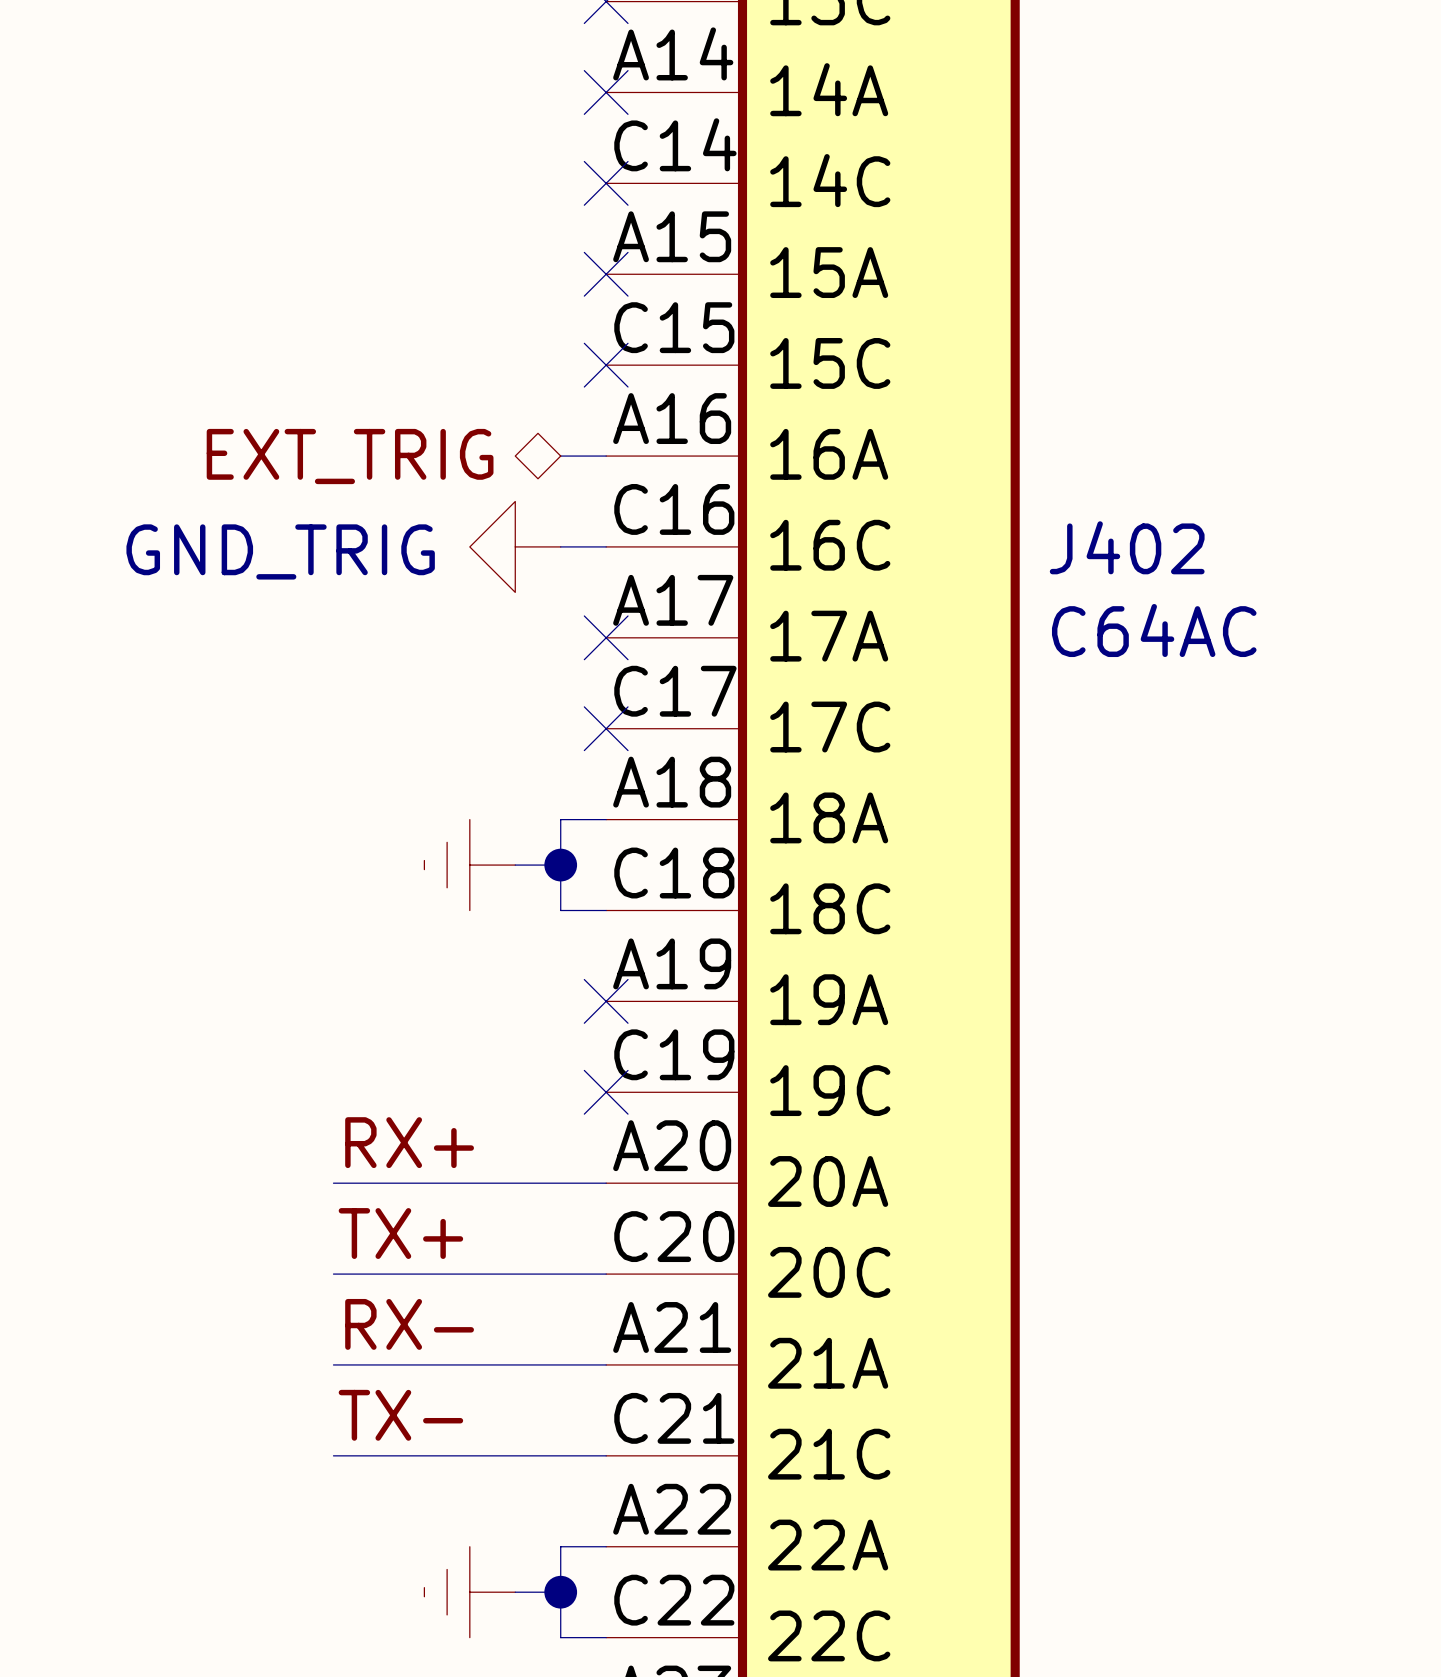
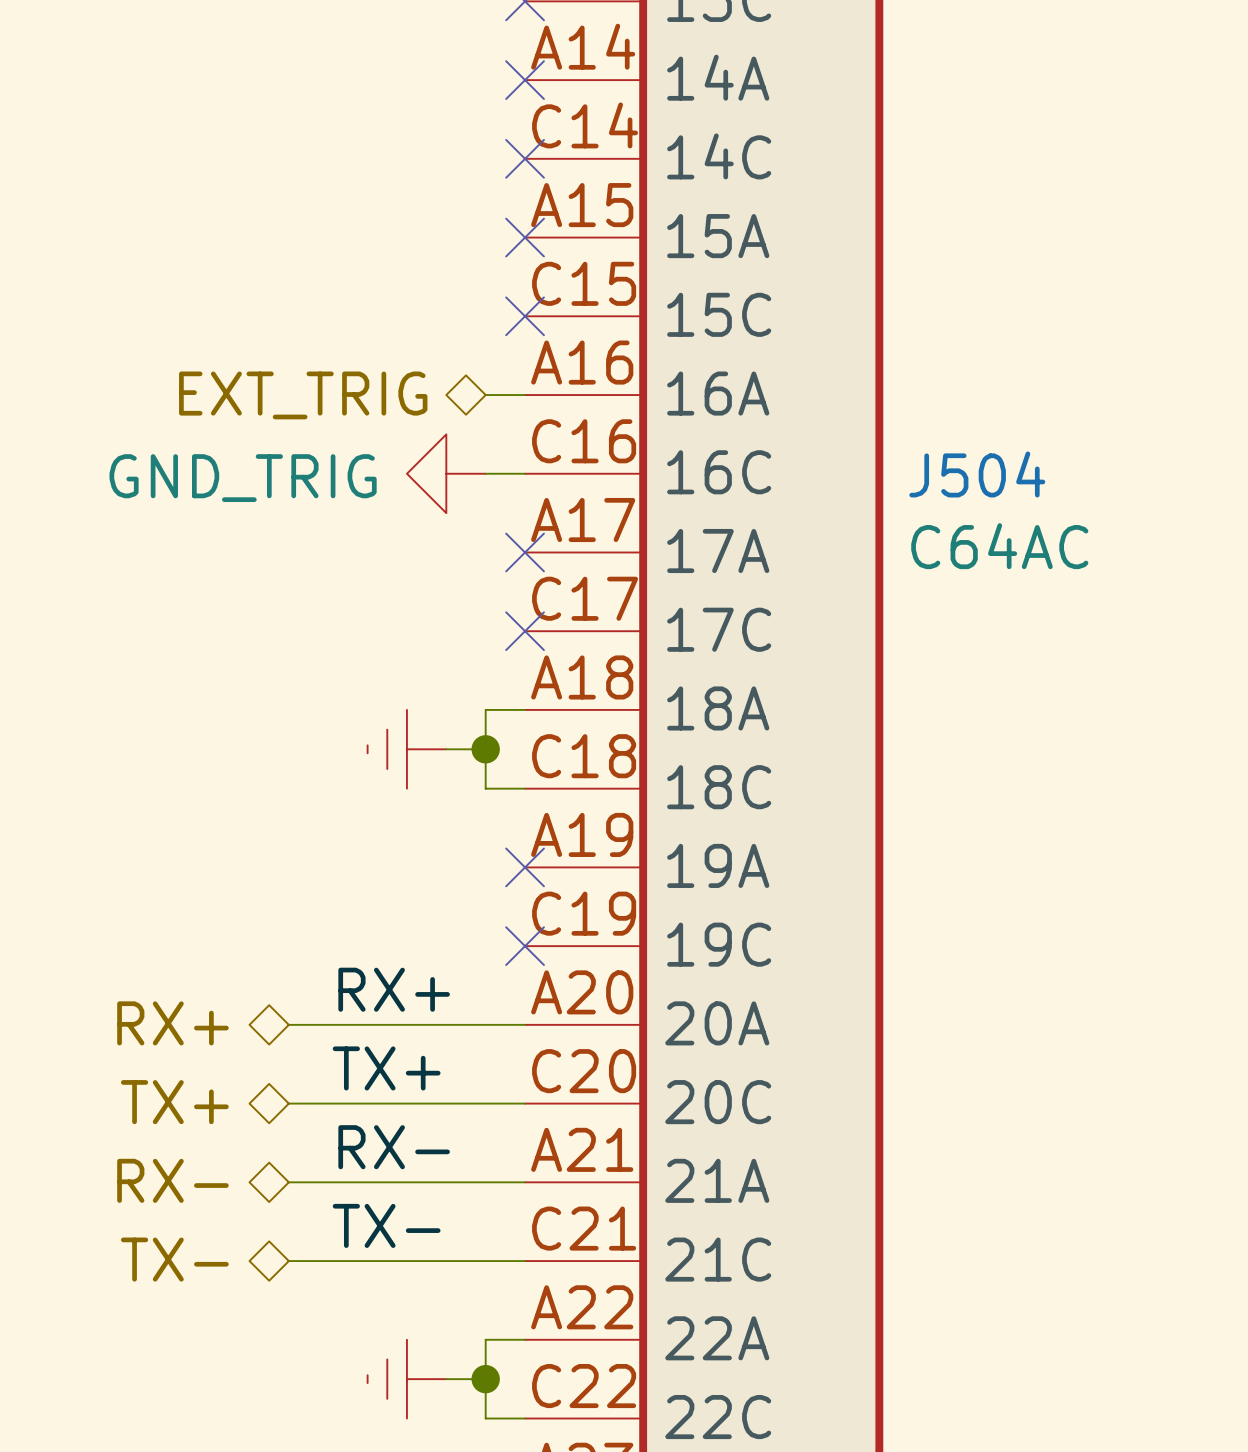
J402 name: J402 (1127, 547) -> J504 (977, 474)
label position: RX+ (409, 1142) -> RX+ (394, 989)
hierarchical label: none -> RX+ (172, 1023)
label position: TX+ (400, 1233) -> TX+ (386, 1068)
hierarchical label: none -> TX+ (174, 1102)
label position: RX- (409, 1324) -> RX- (394, 1147)
hierarchical label: none -> RX- (172, 1180)
label position: TX- (400, 1415) -> TX- (386, 1225)
hierarchical label: none -> TX- (174, 1259)

